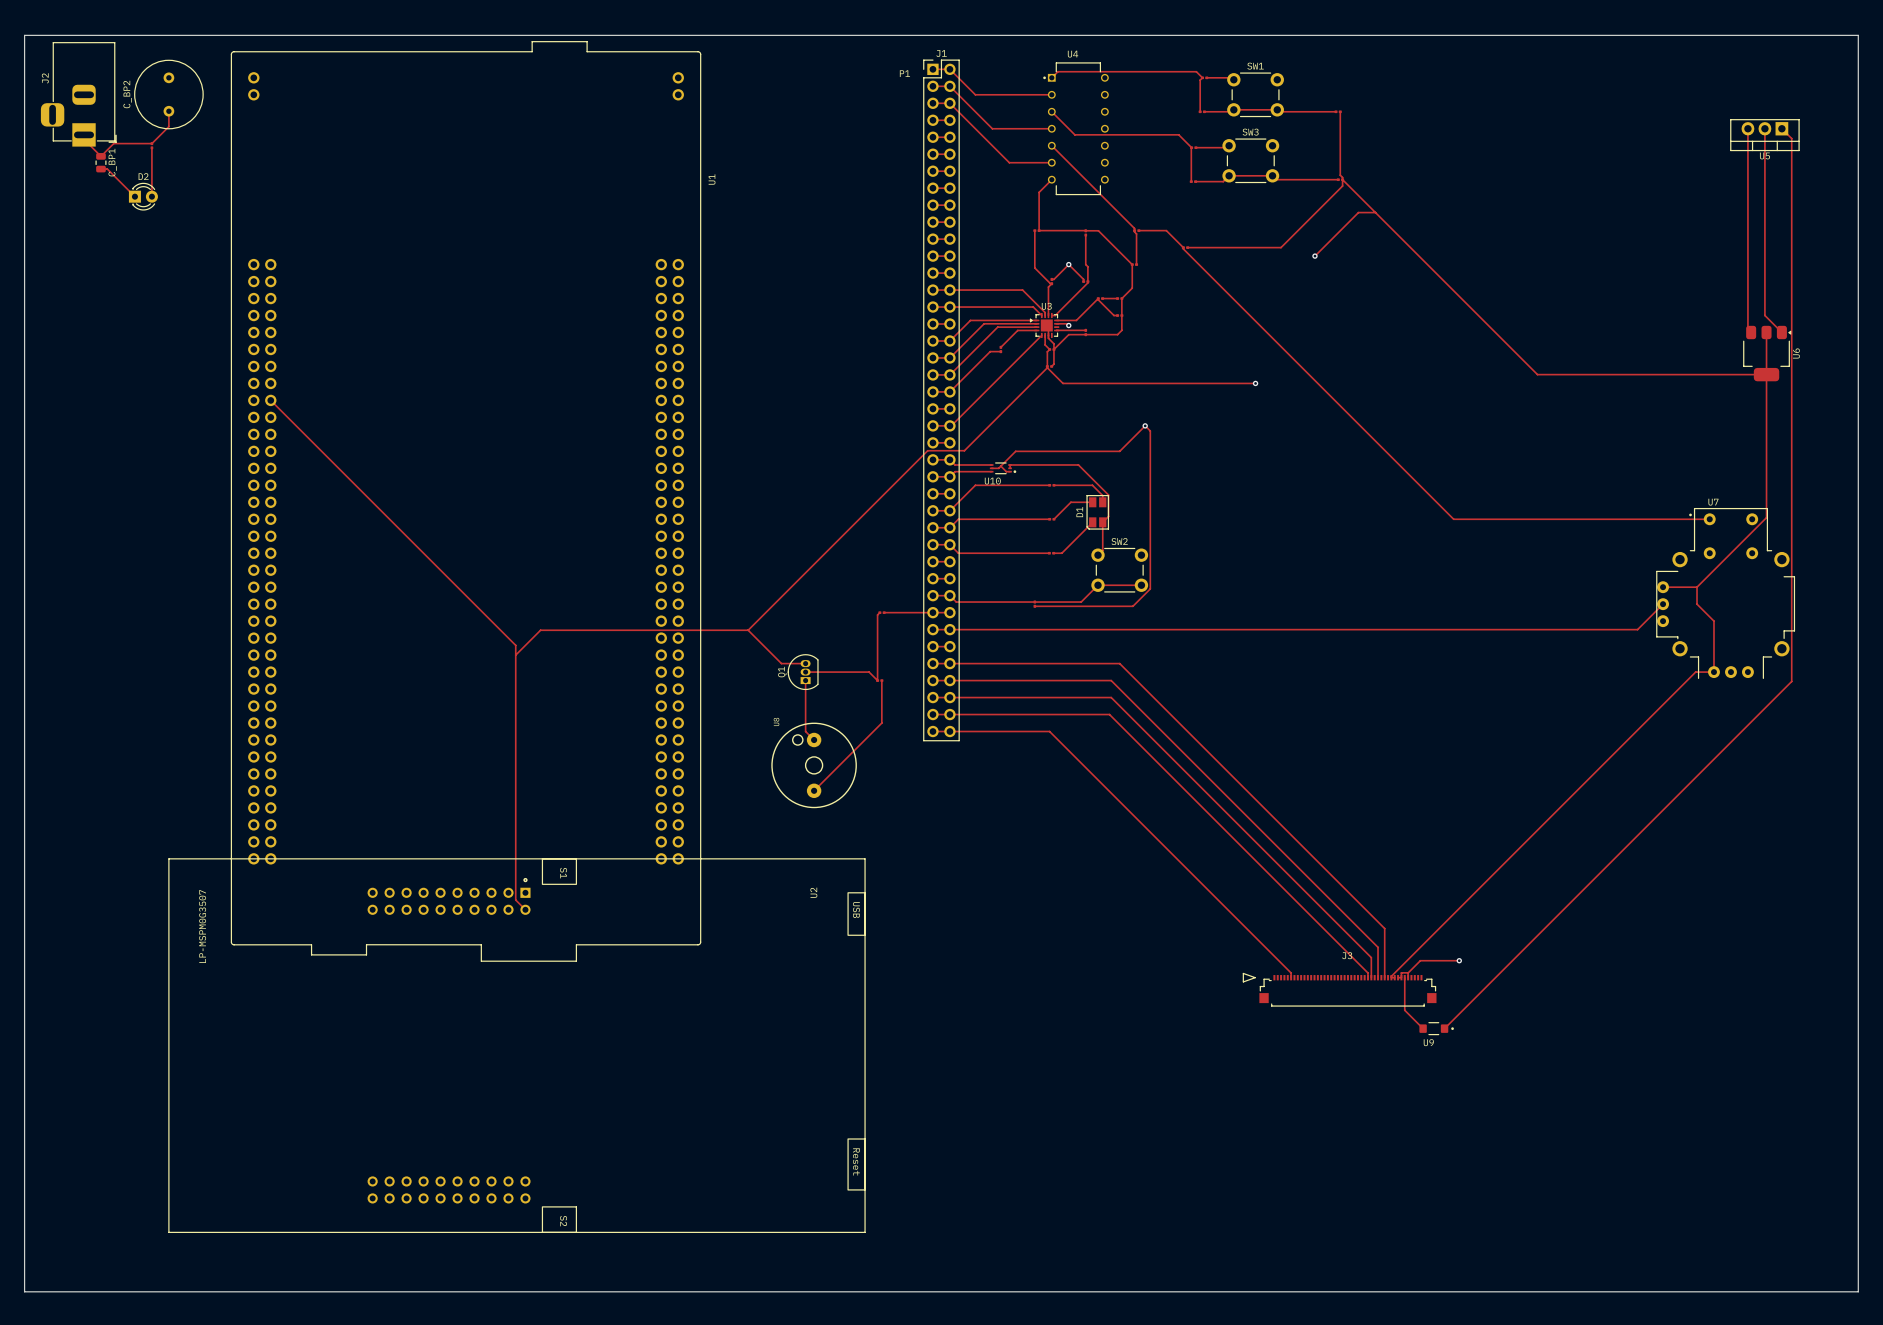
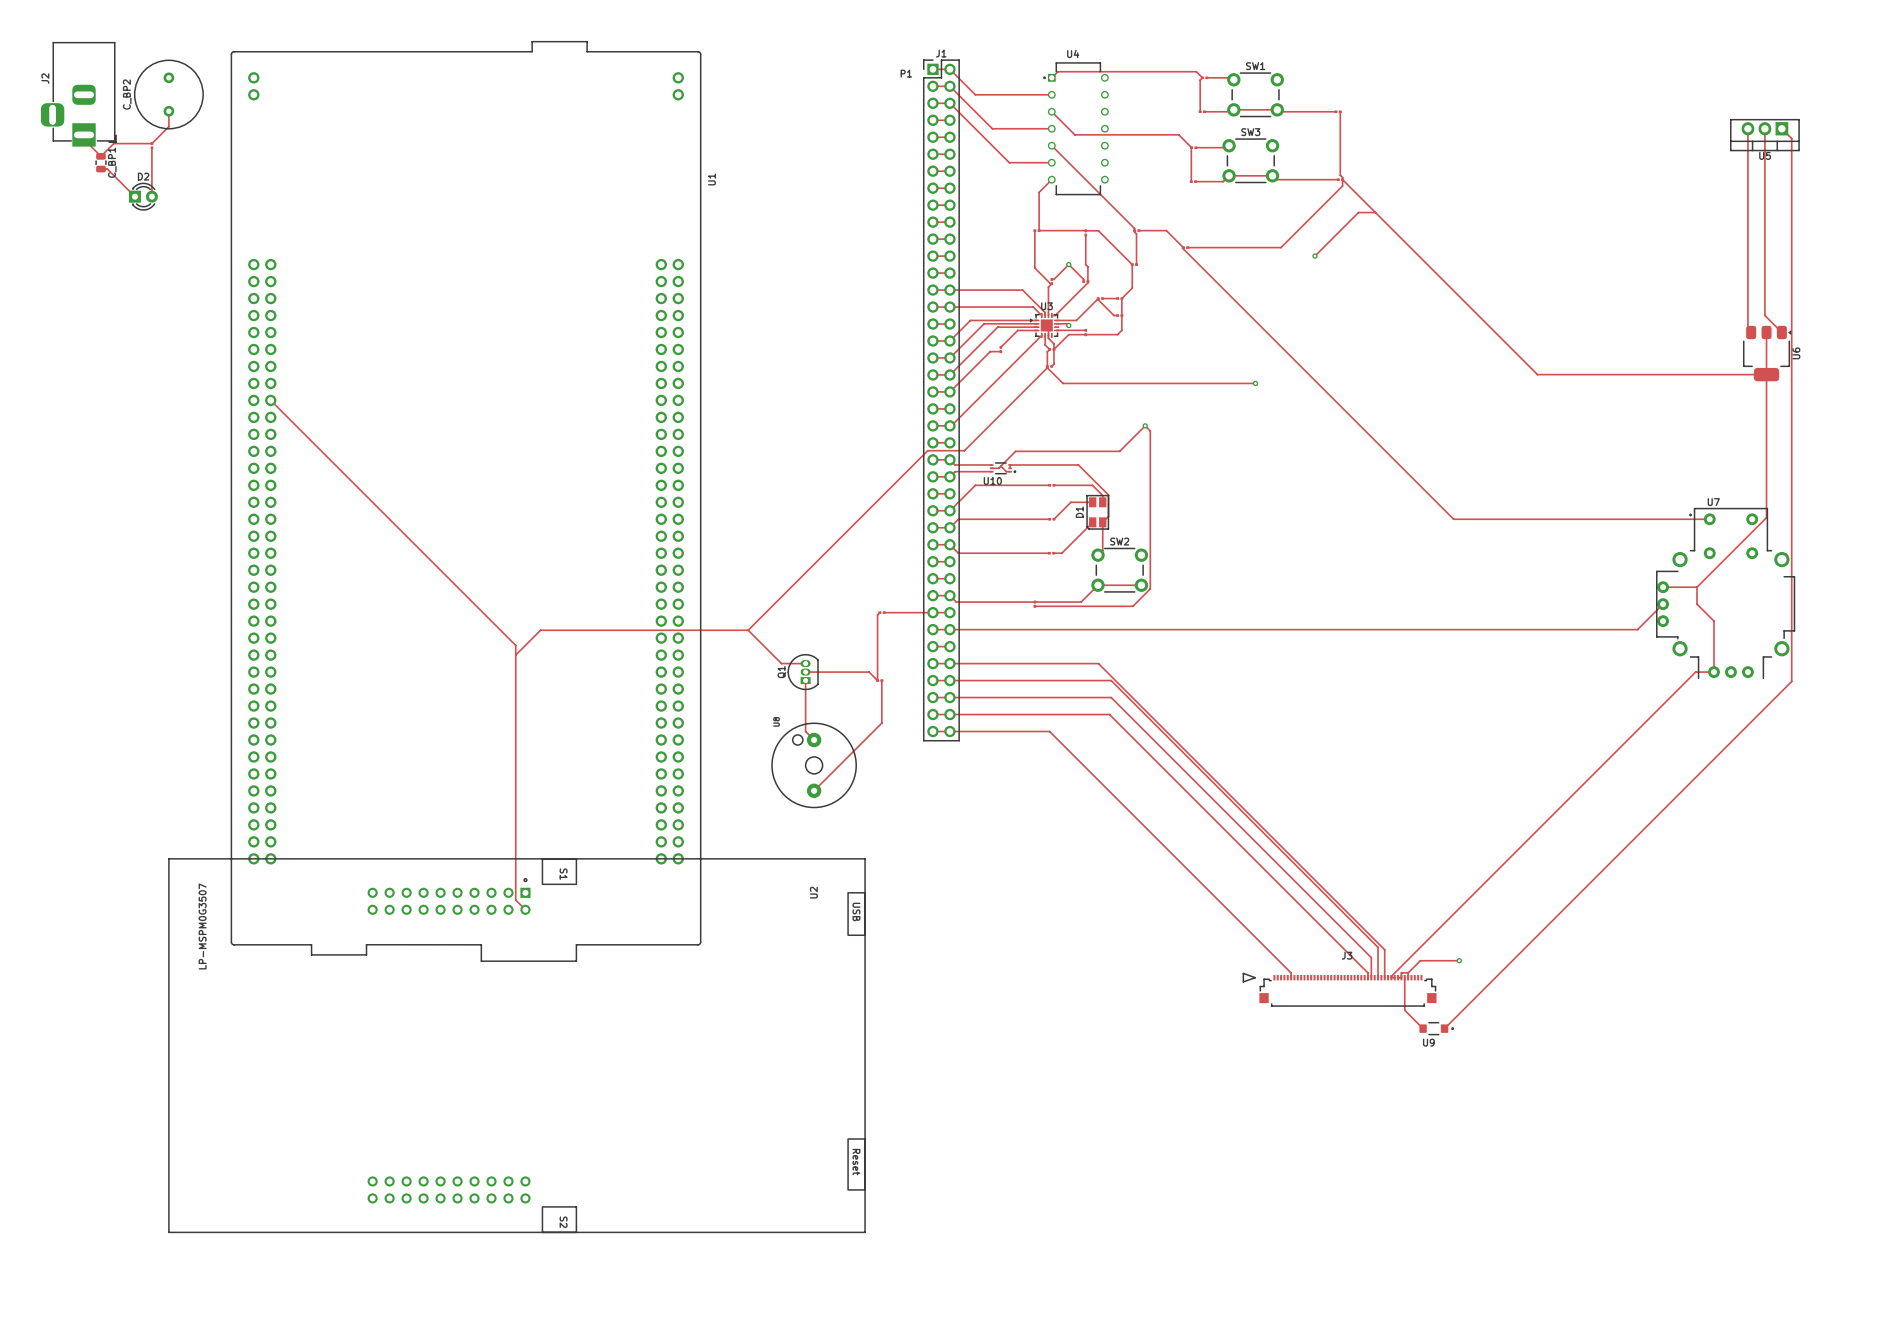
board edge: (24, 35) (1858, 35) (1858, 1291) (24, 1291) (24, 35) -> none
track: (1098, 663) (1119, 663) (1384, 928) (1384, 949) -> (1098, 663) (1384, 949)

